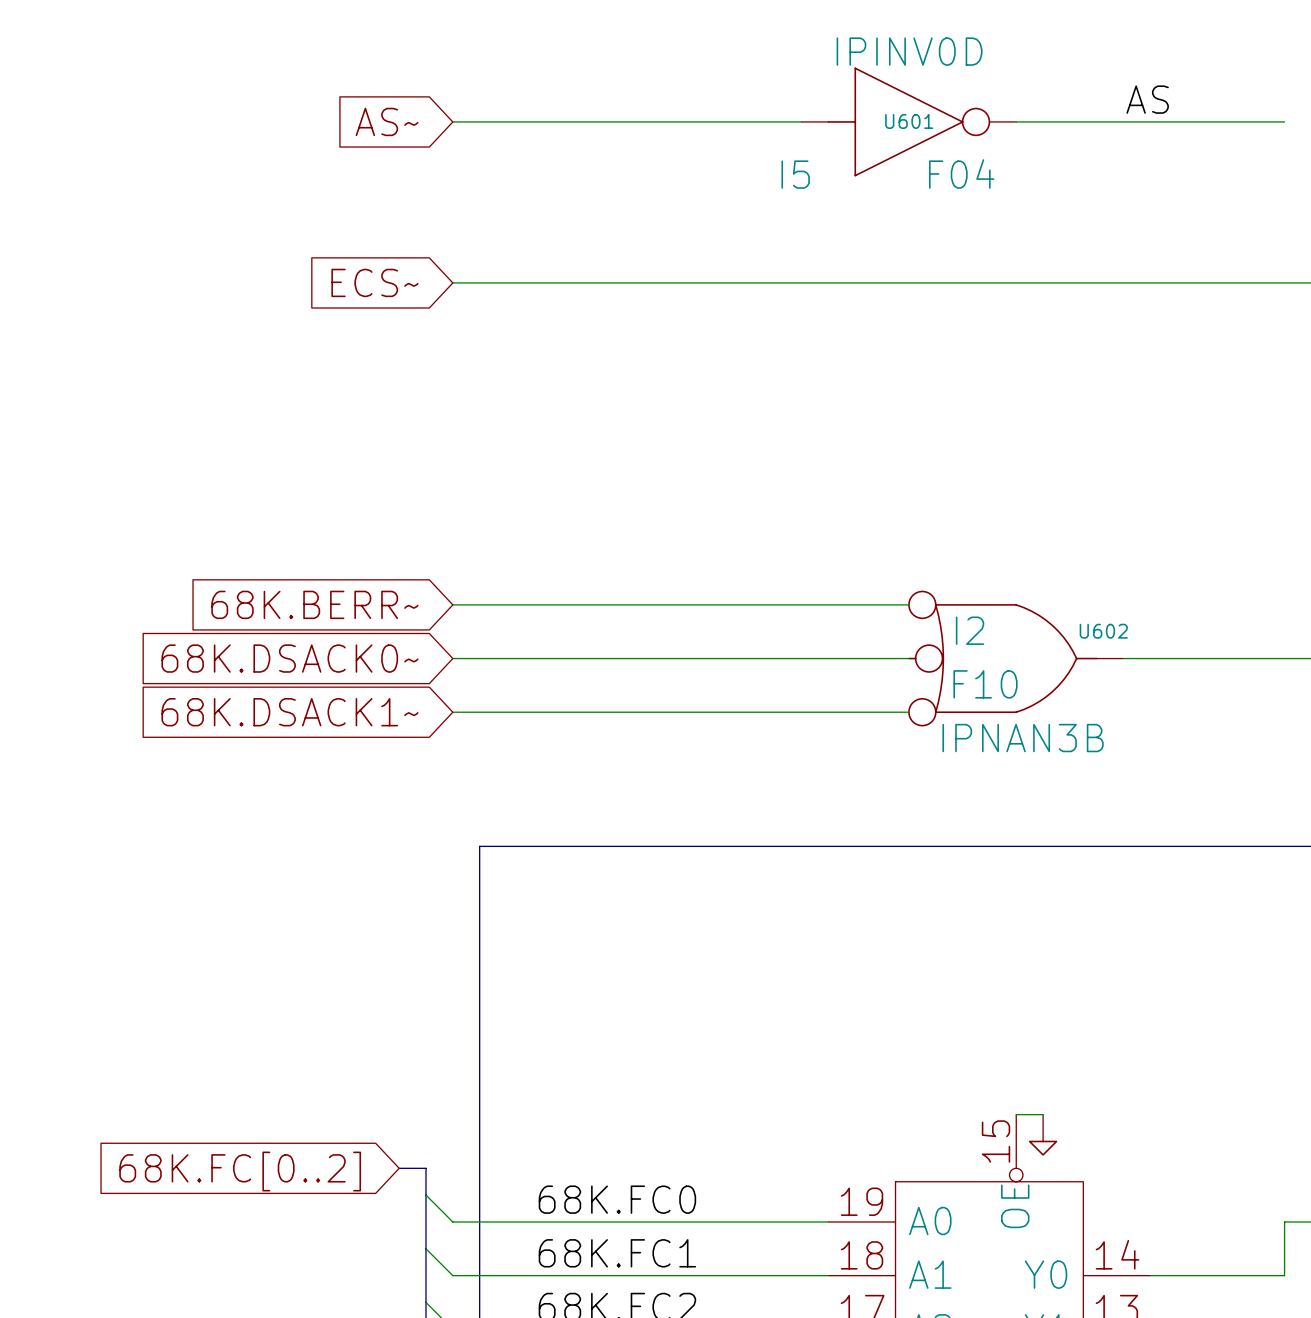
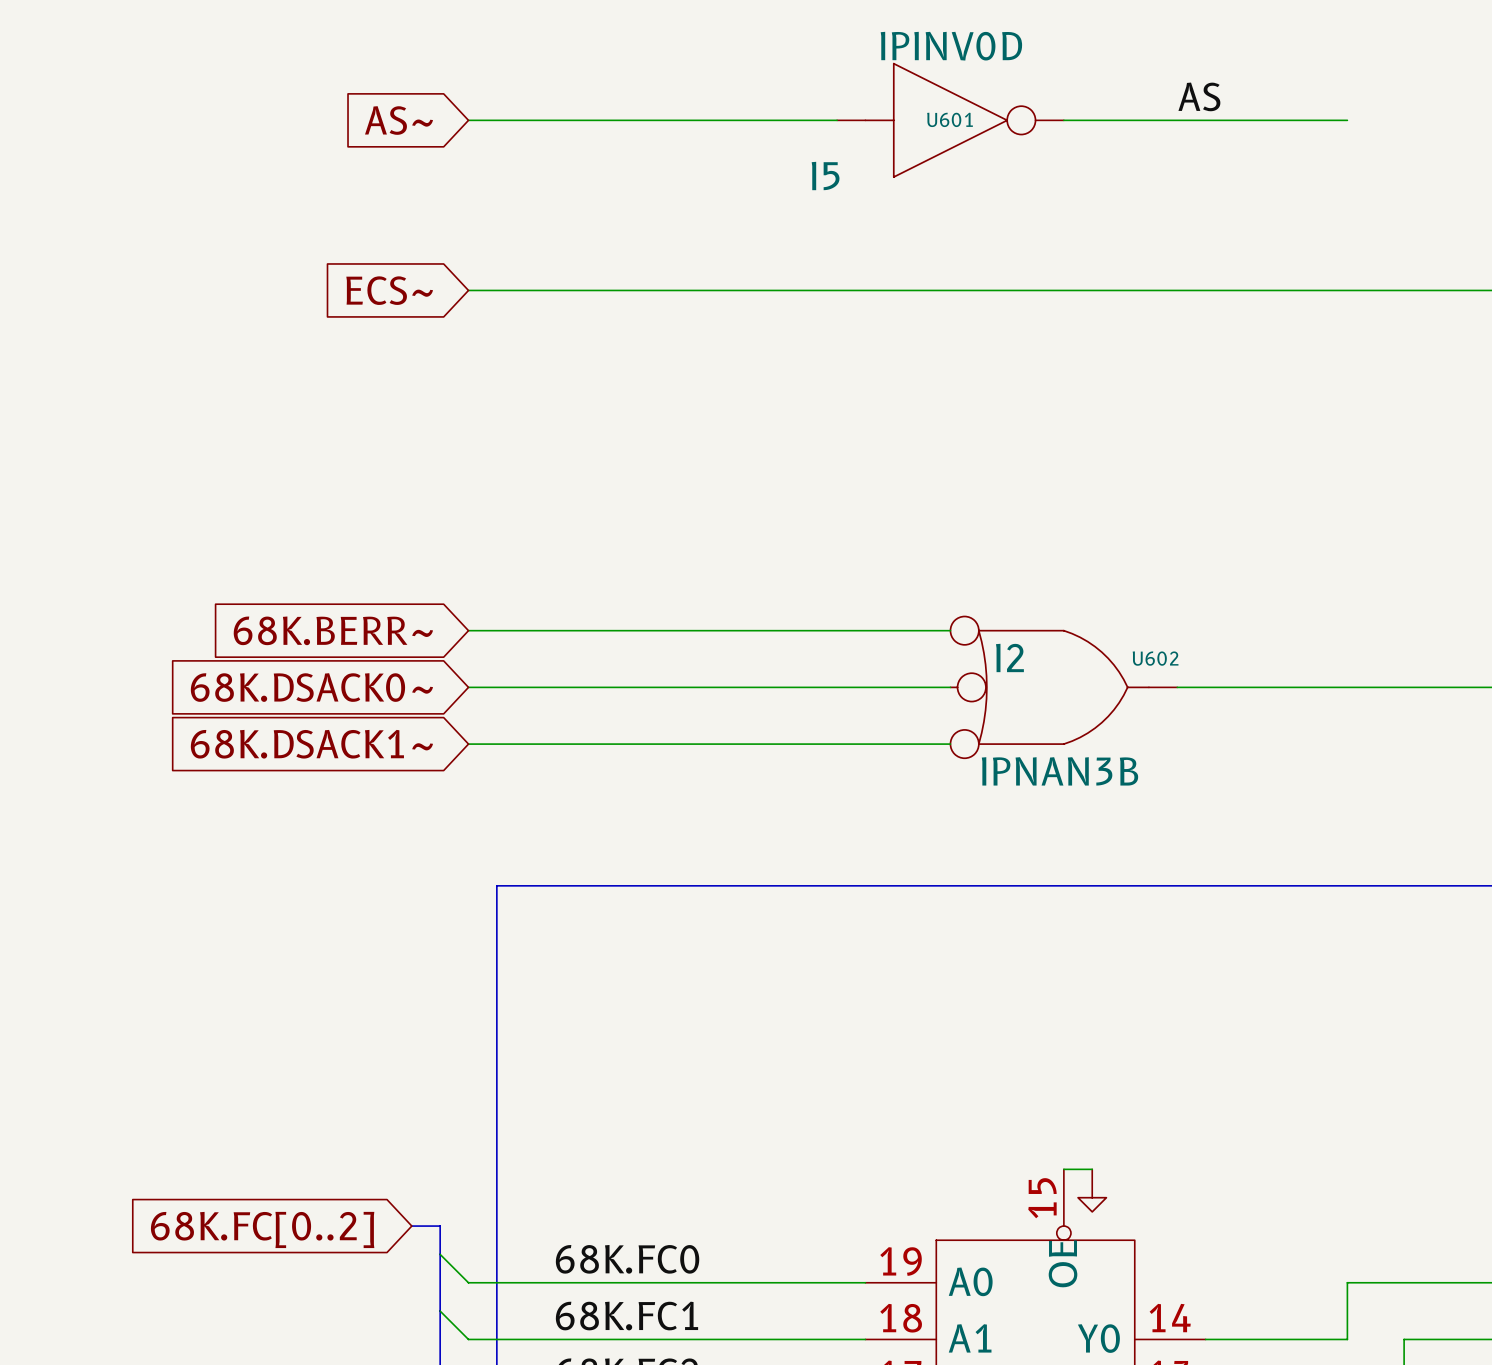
U601 value: F04 (961, 173) -> none
U602 value: F10 (985, 684) -> none

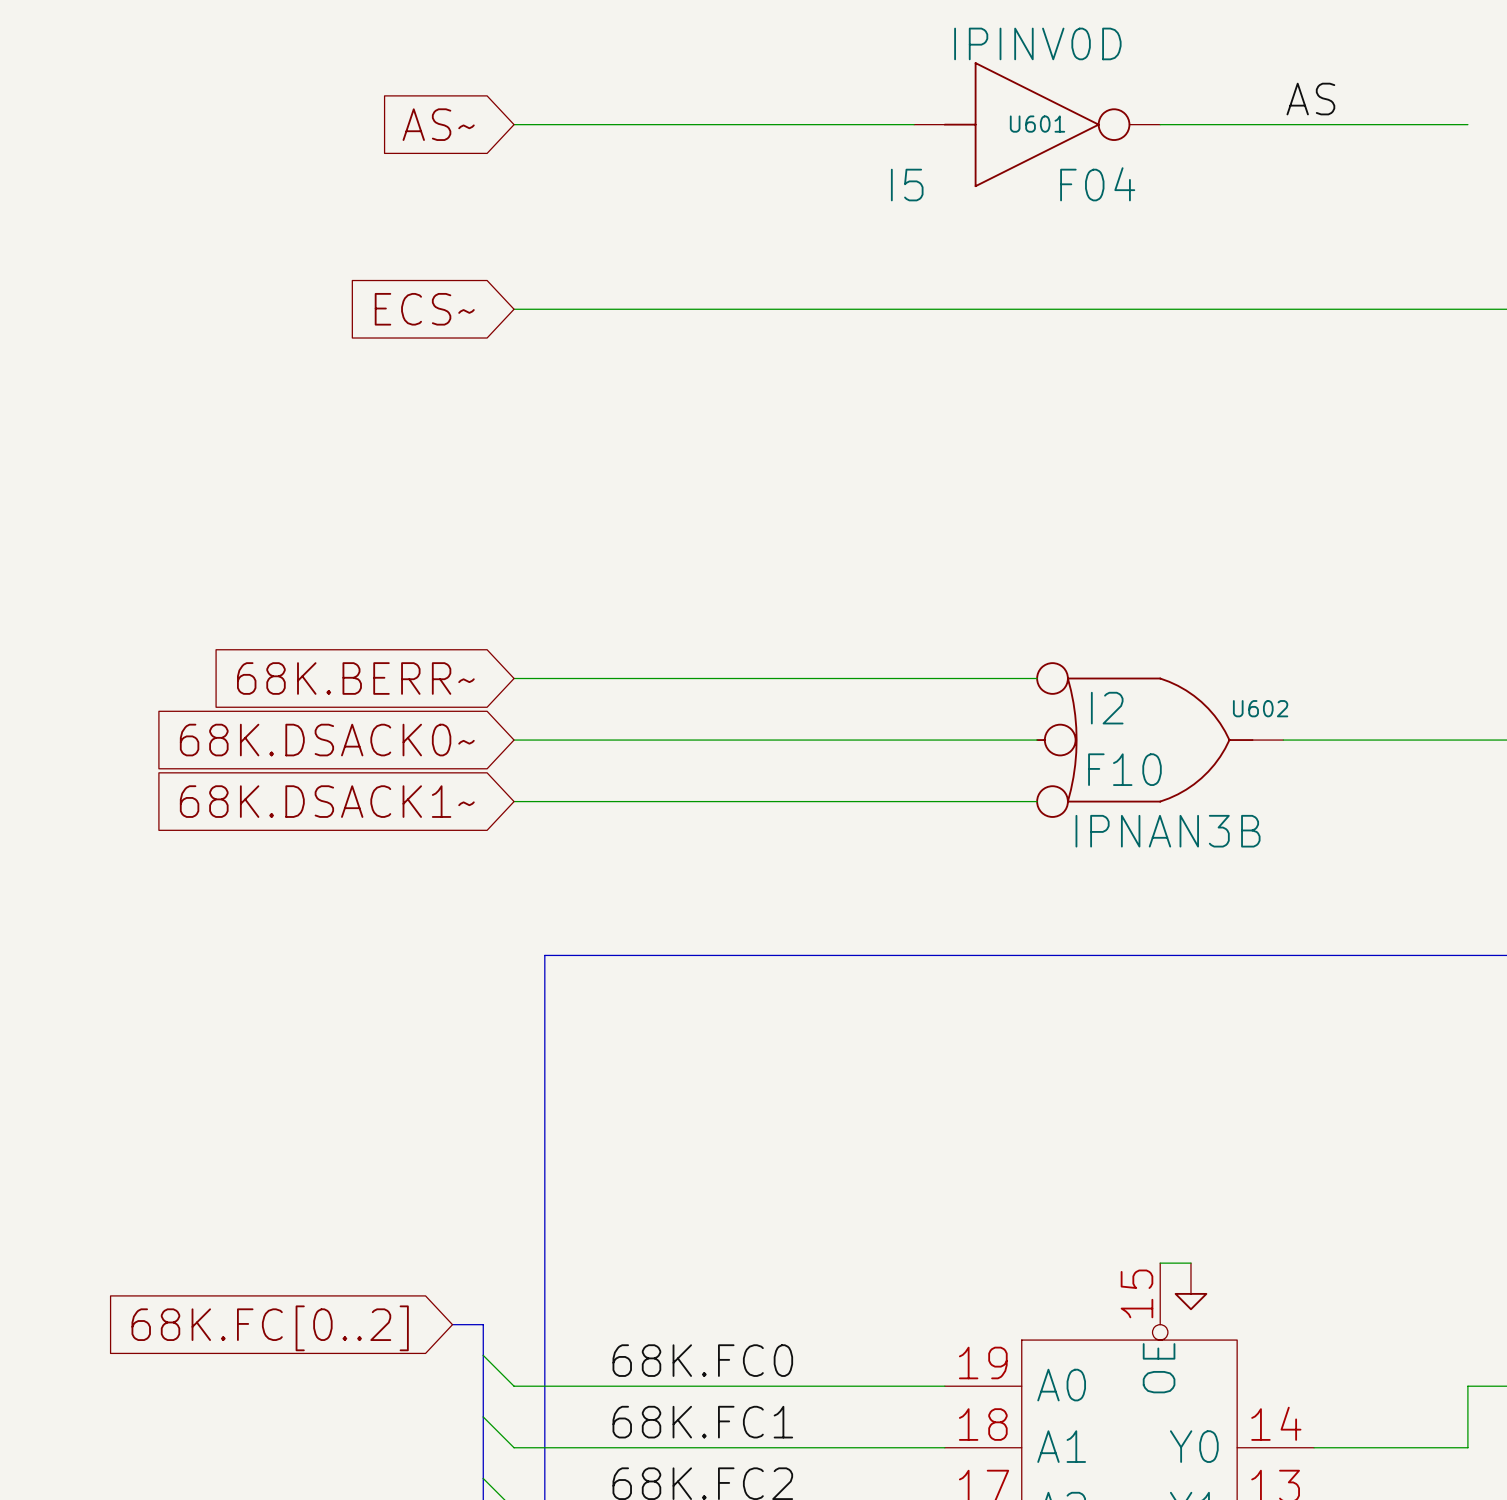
U601 value: none -> F04 (1097, 184)
U602 value: none -> F10 (1124, 769)

